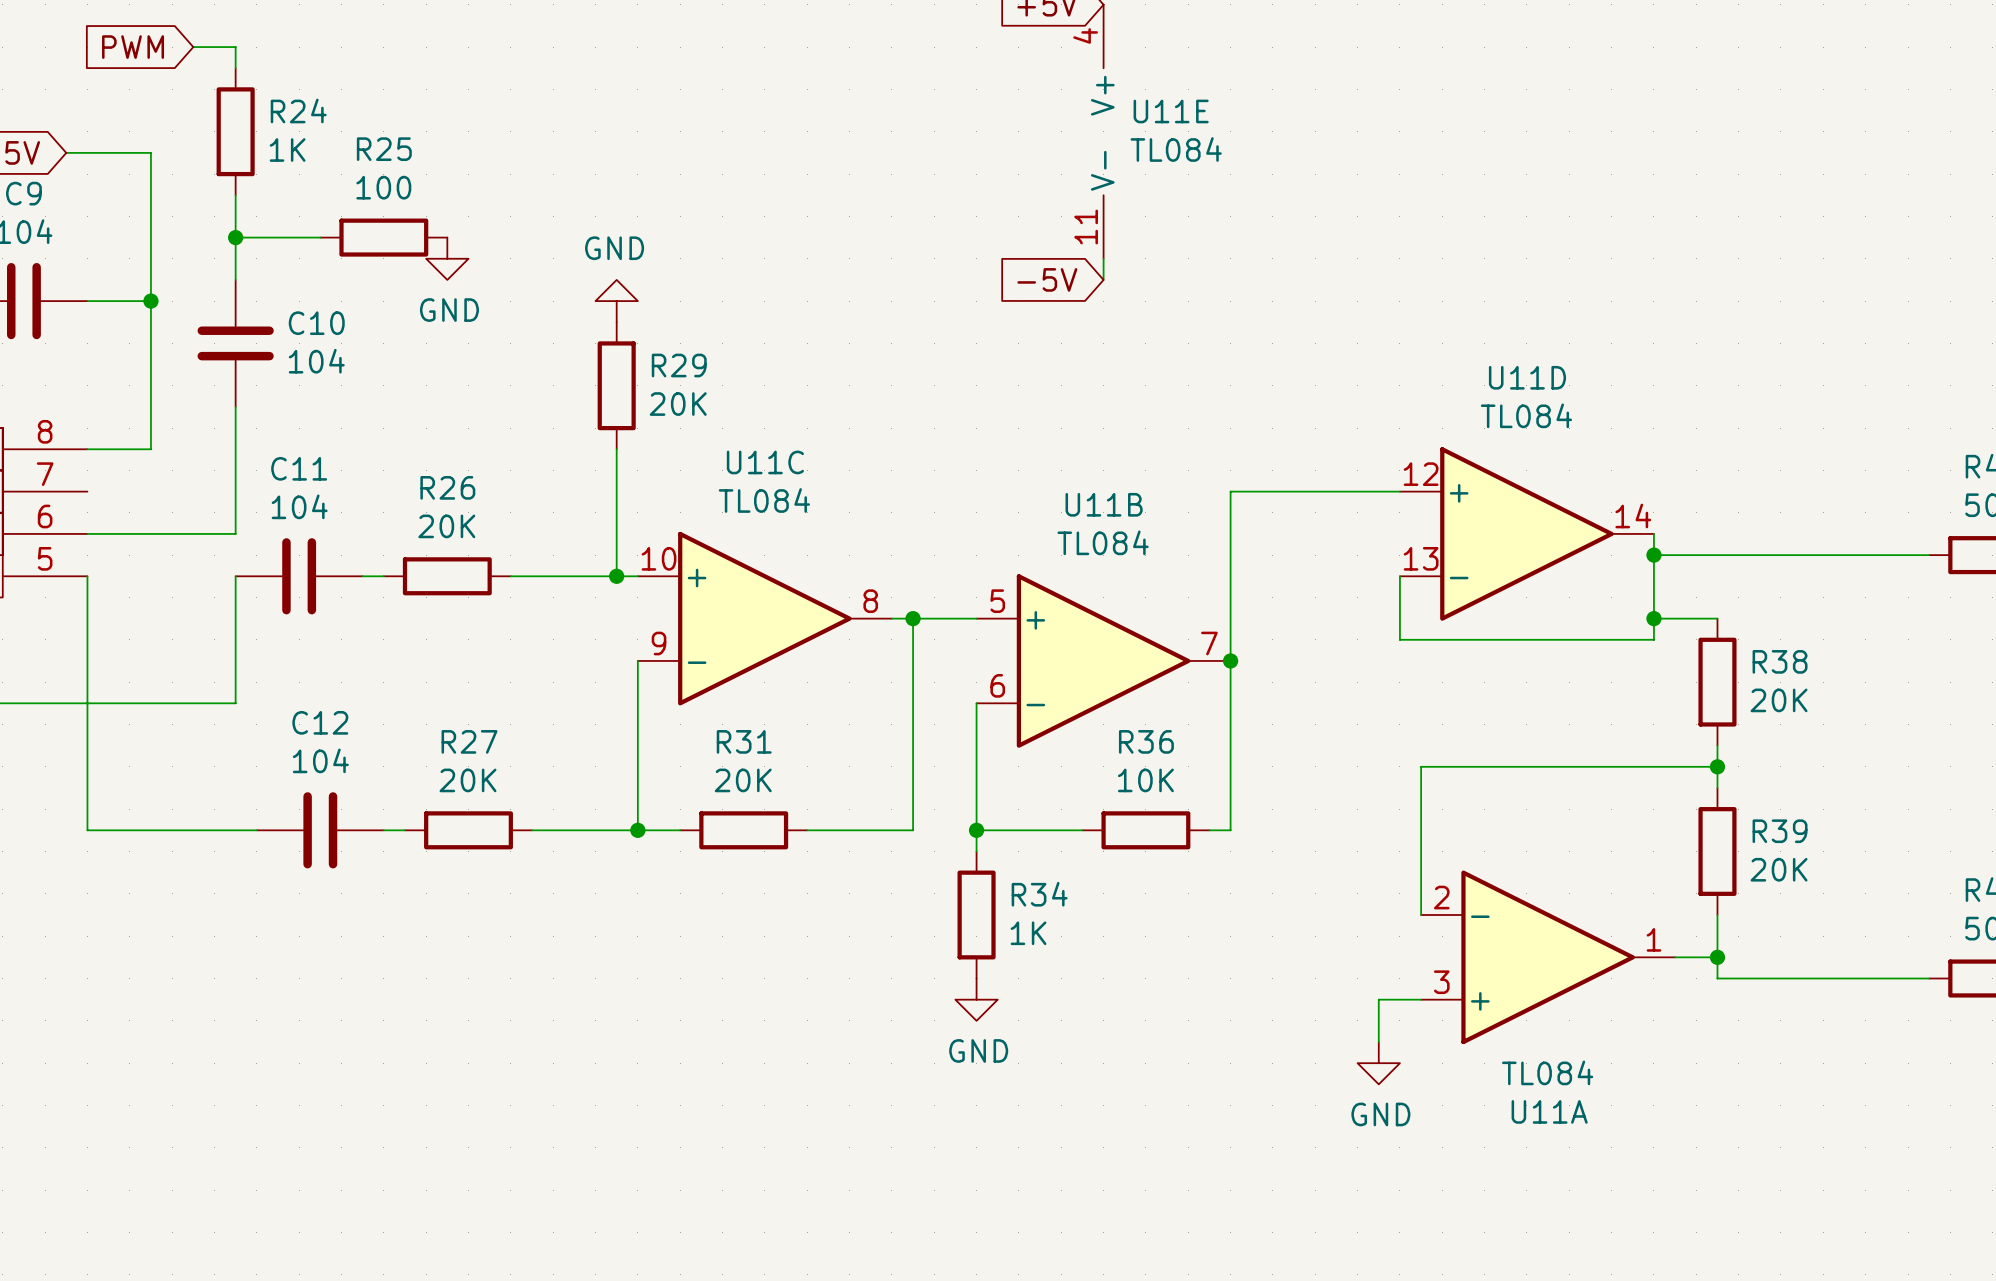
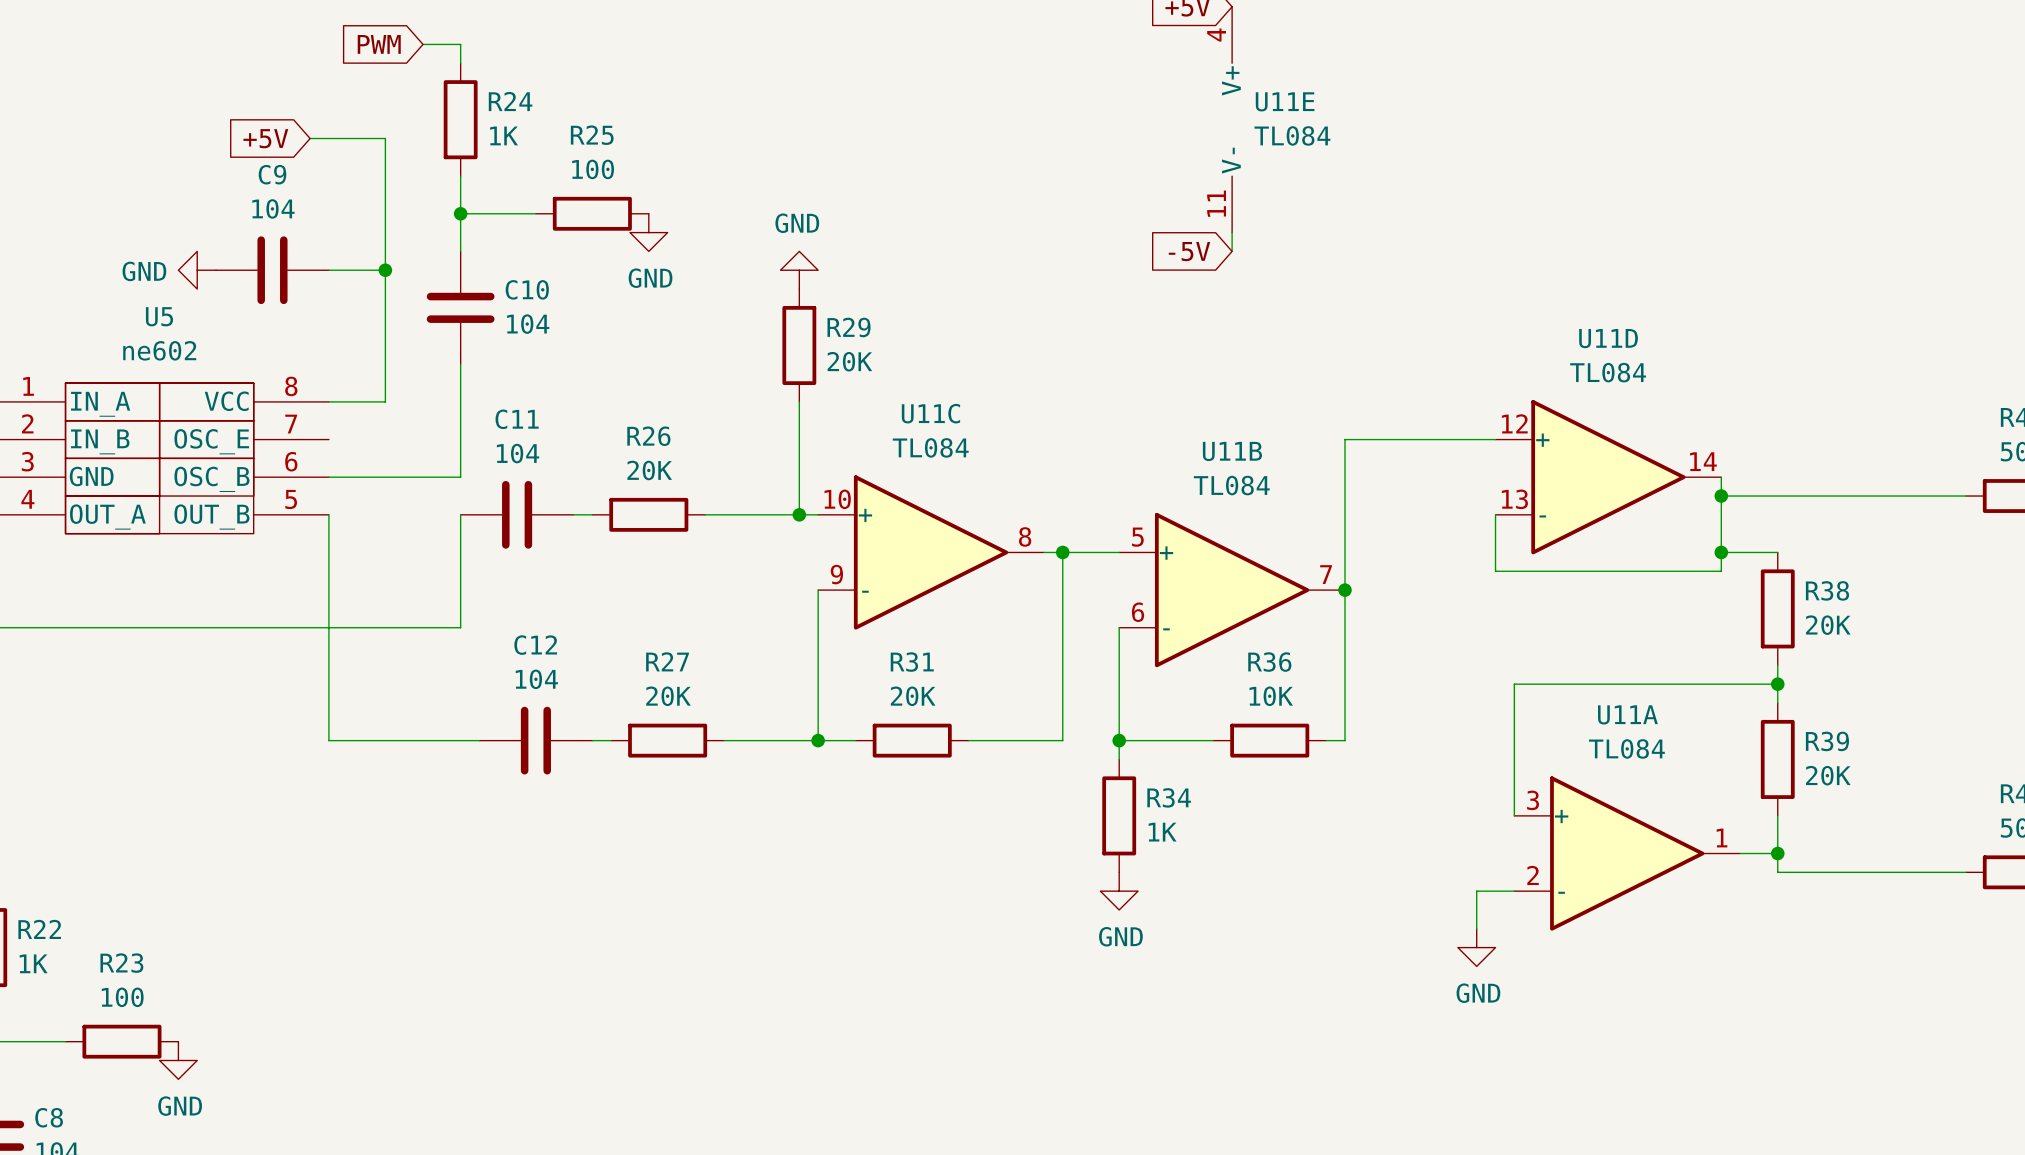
U11A flip: as is (1548, 957) -> up-down (1627, 853)

